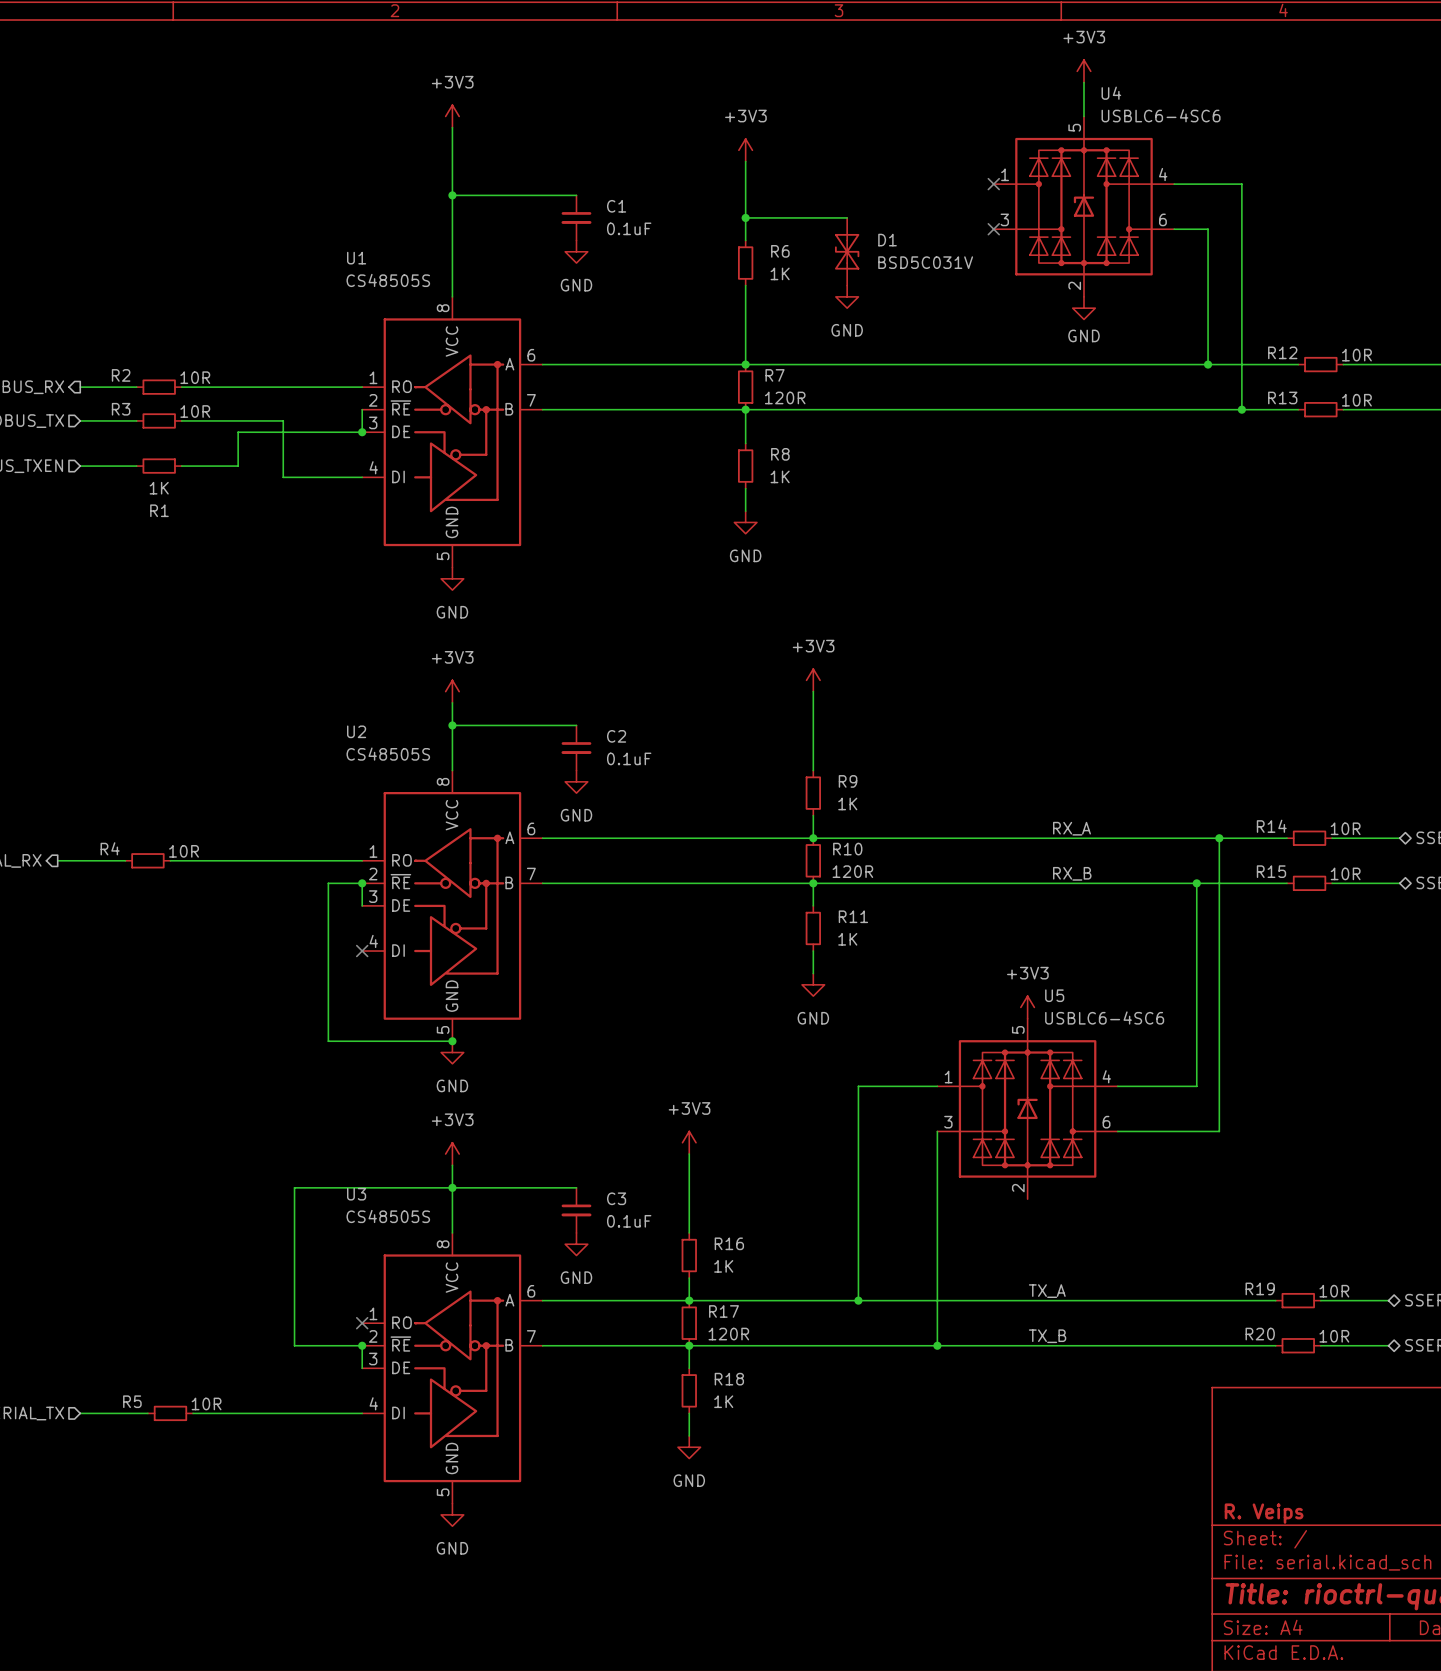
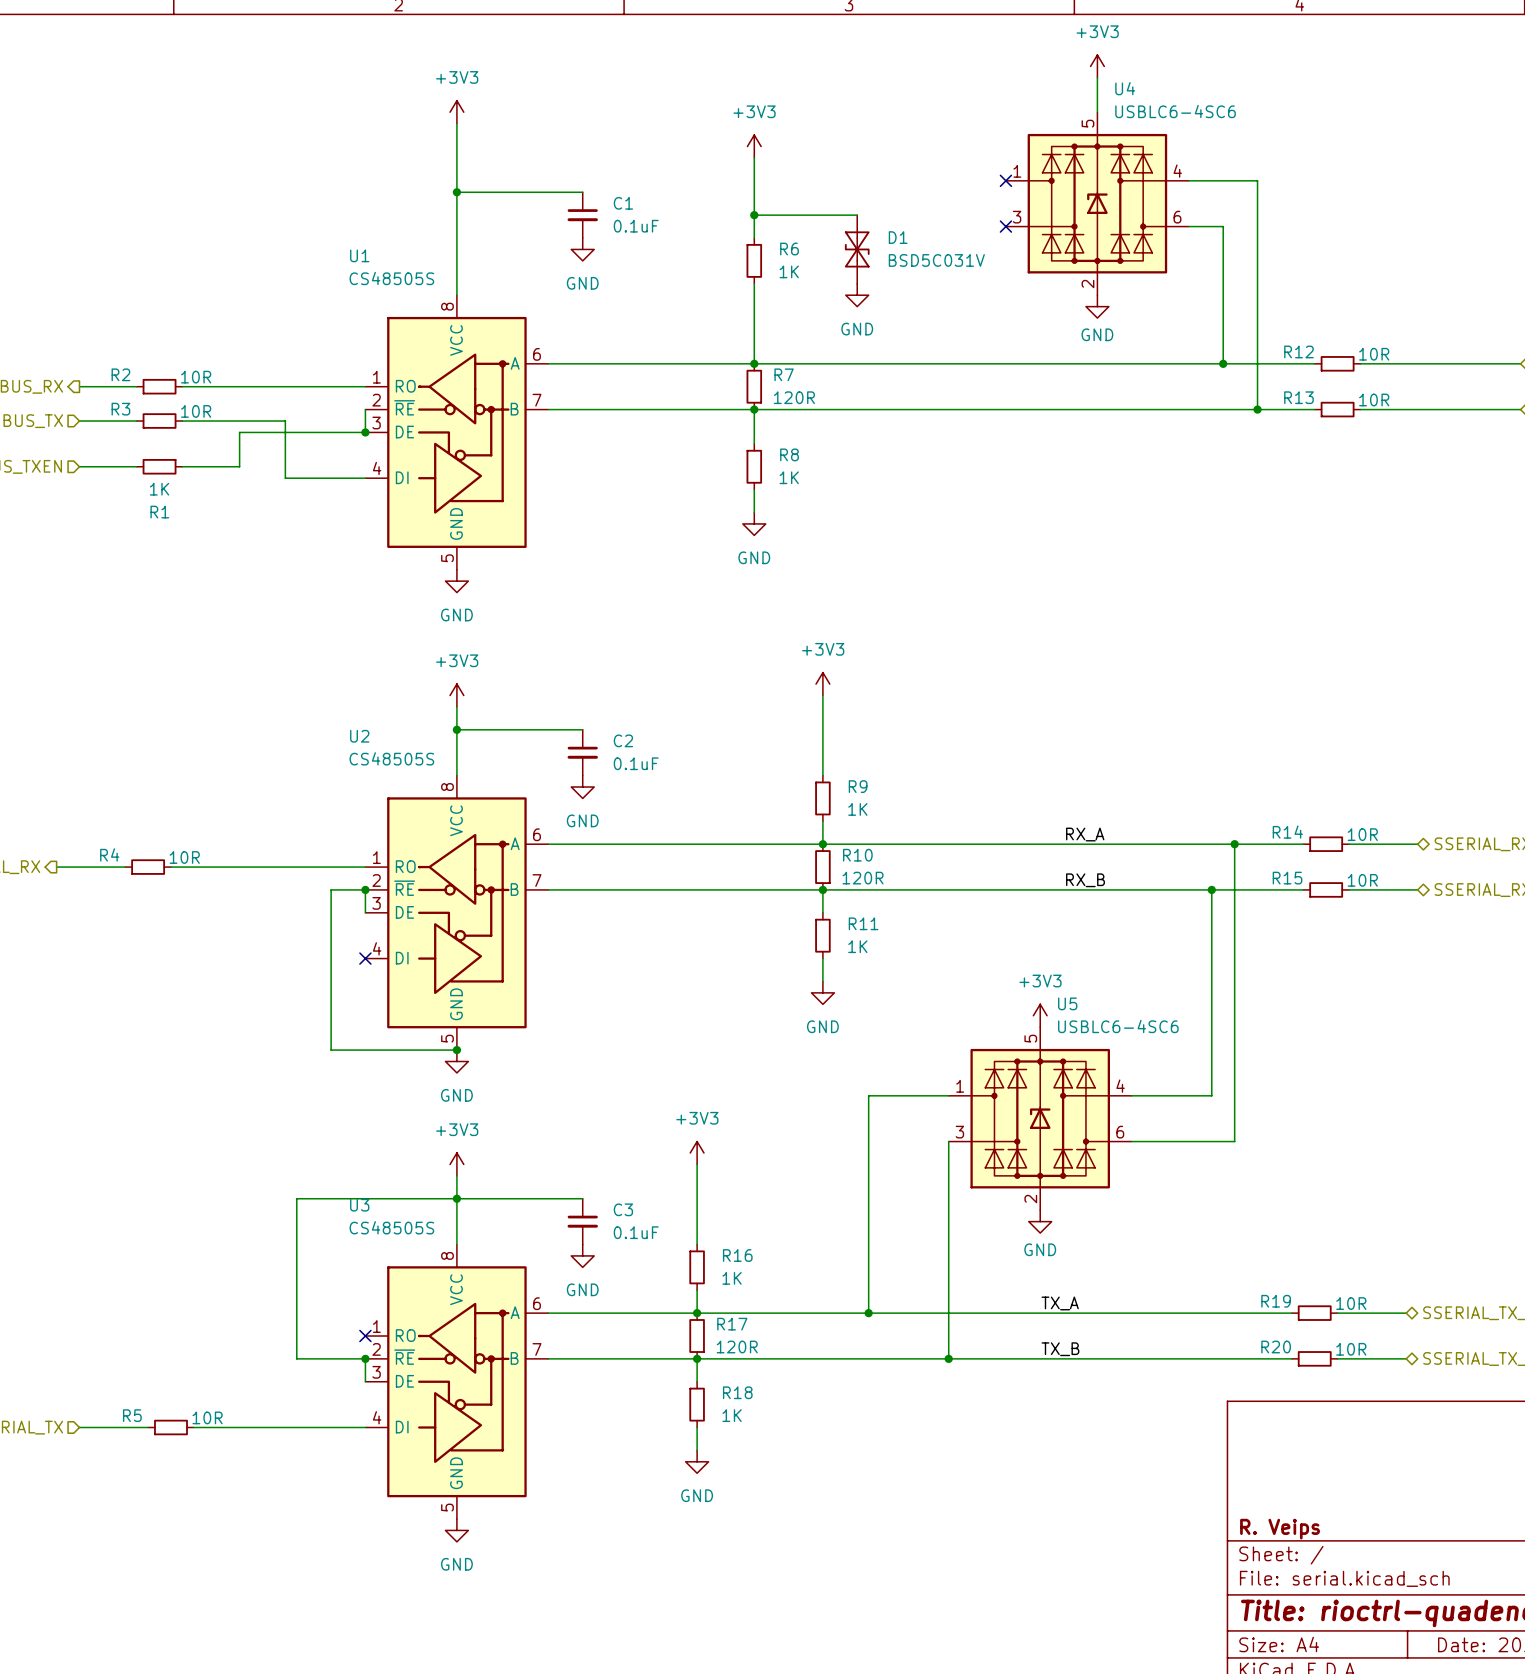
power symbol: none -> GND (1040, 1221)

